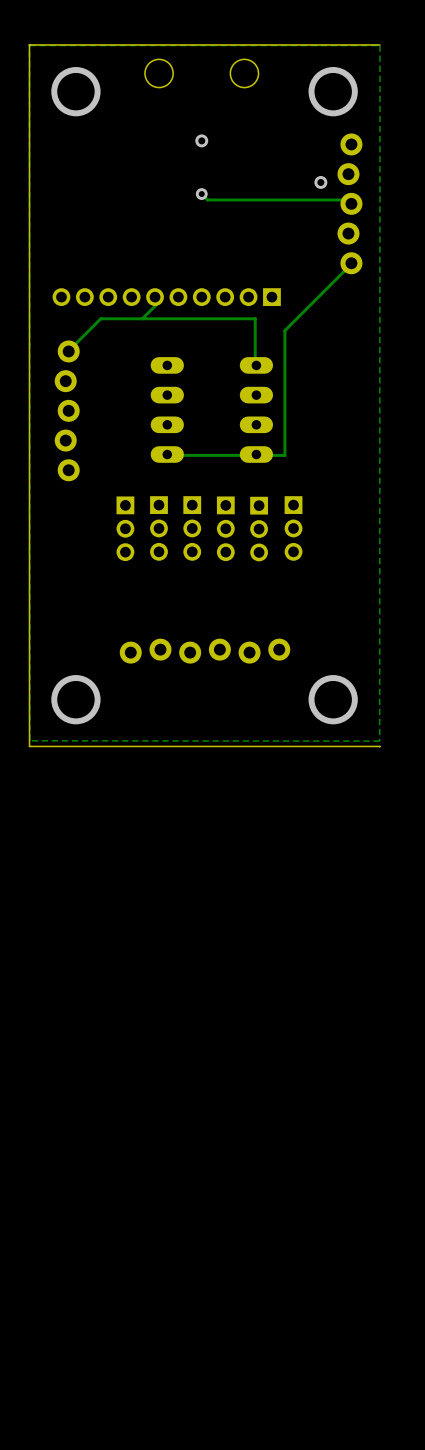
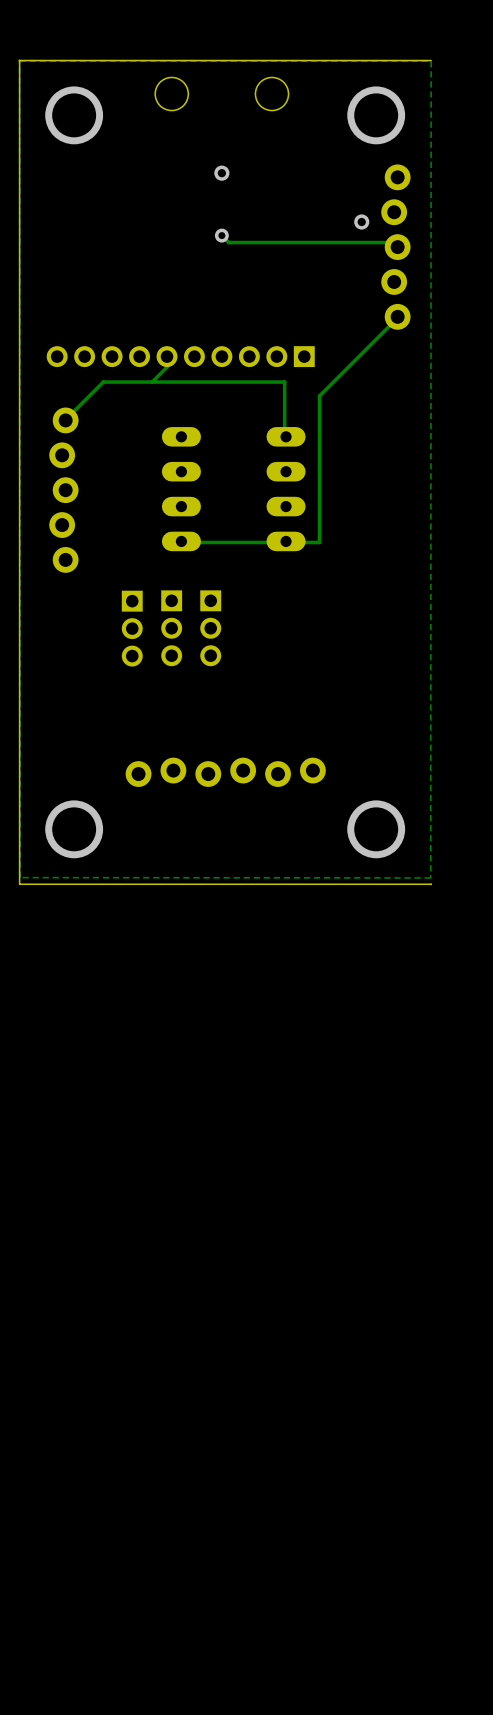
part: (225, 528) -> none
part: (293, 528) -> none
part: (259, 529) -> none

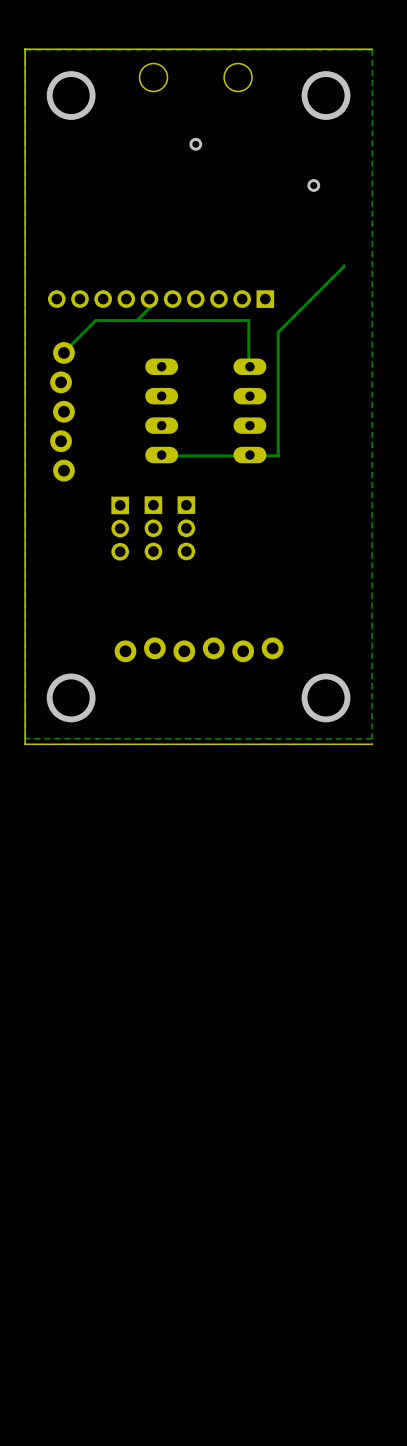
track: (221, 235) (228, 242) (396, 242) (397, 247) -> none
via: (221, 235) -> none
part: (395, 247) -> none

